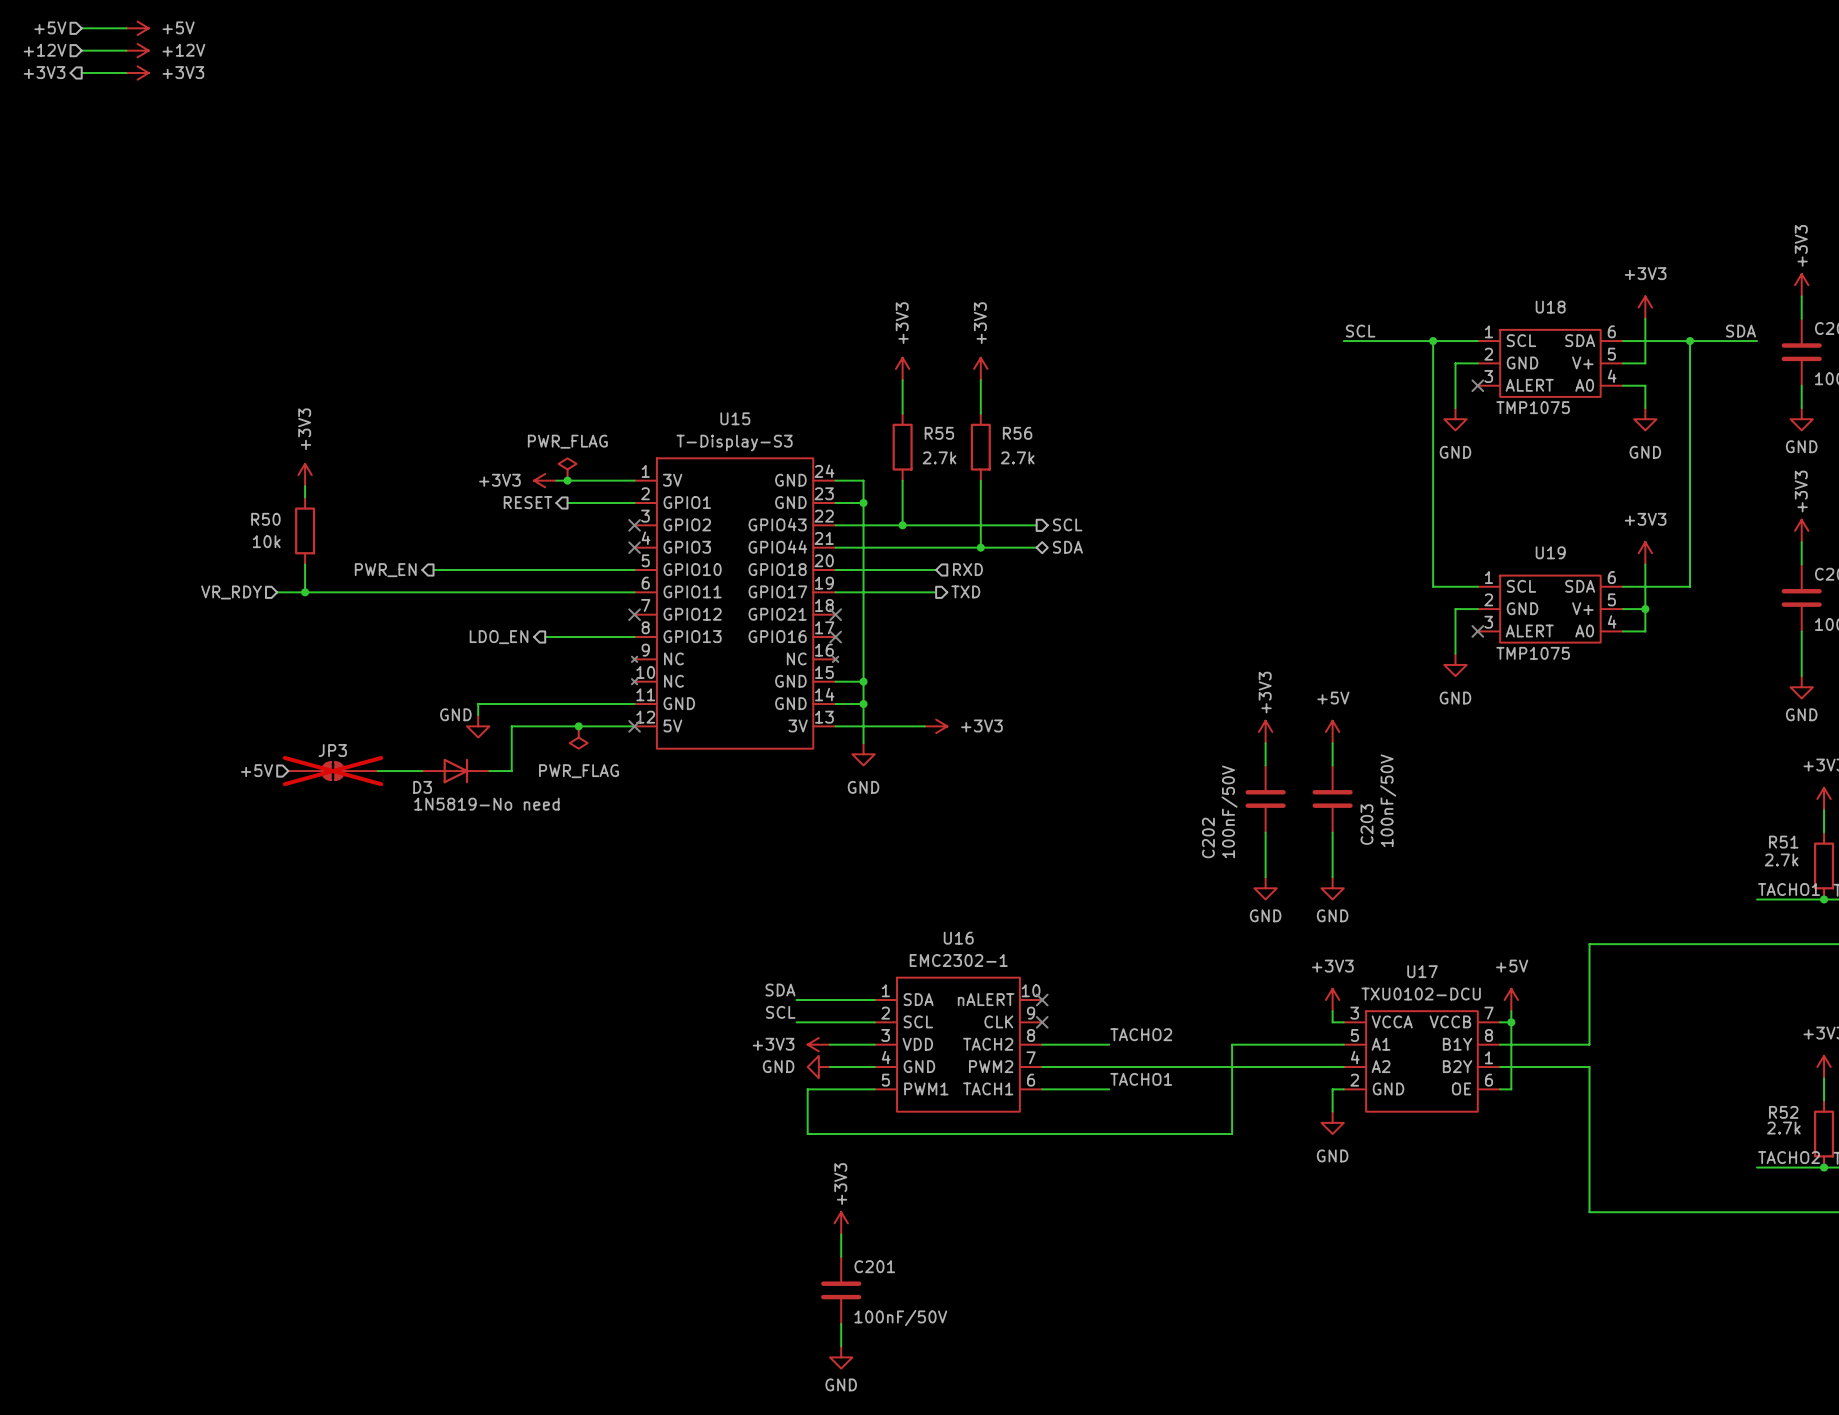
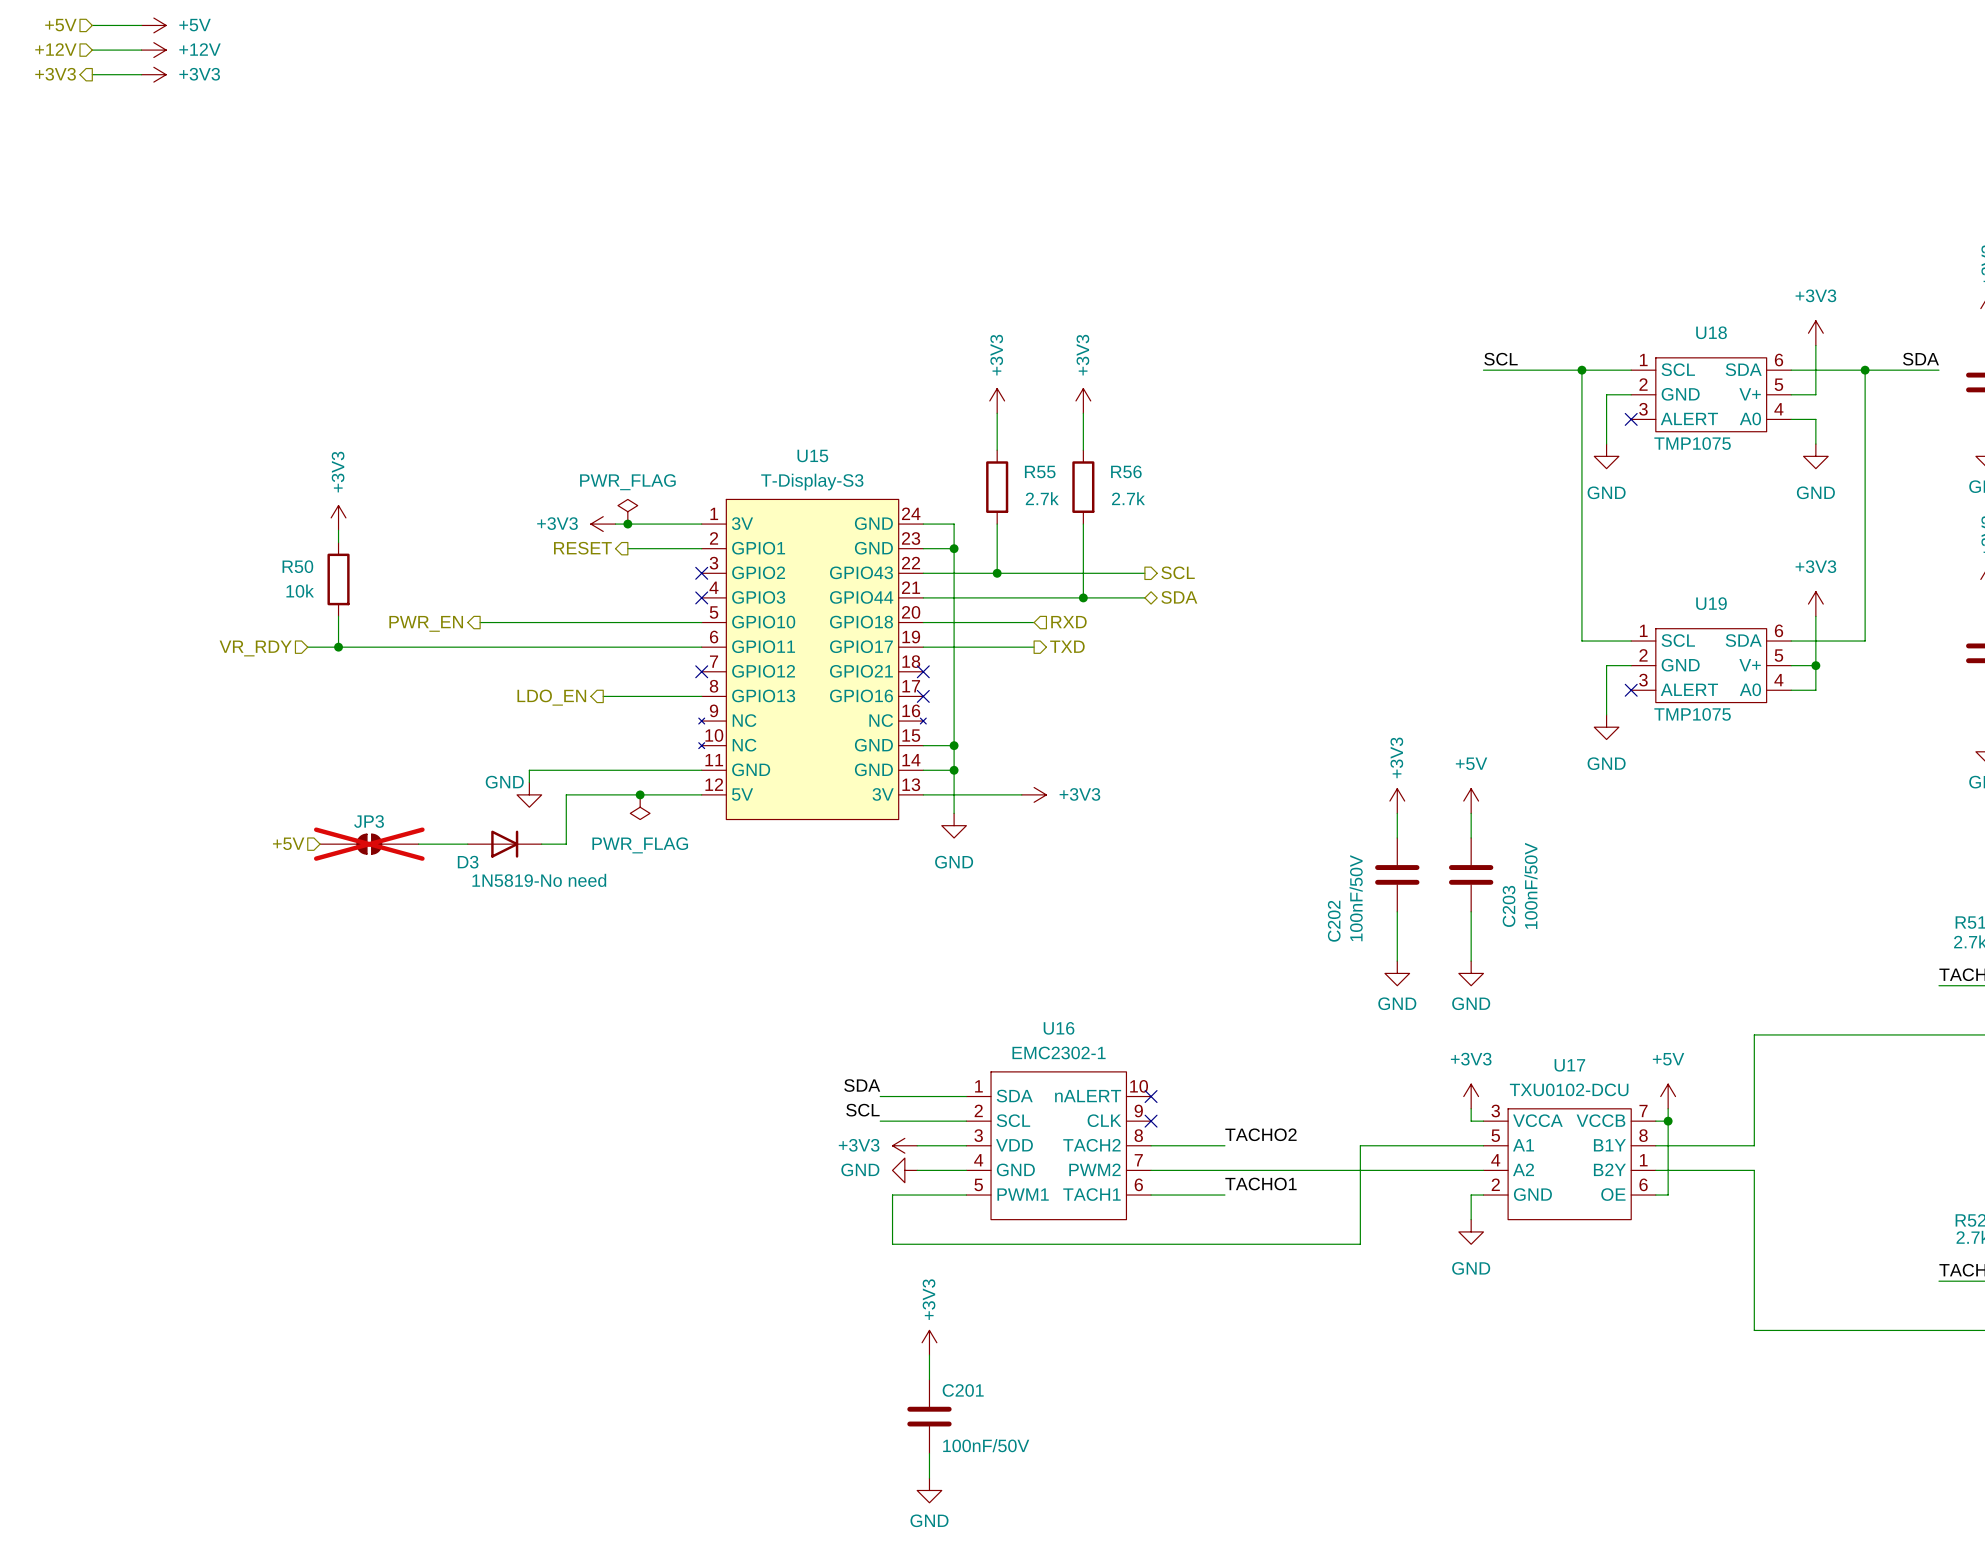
no-connect mark: (634, 726) -> none

